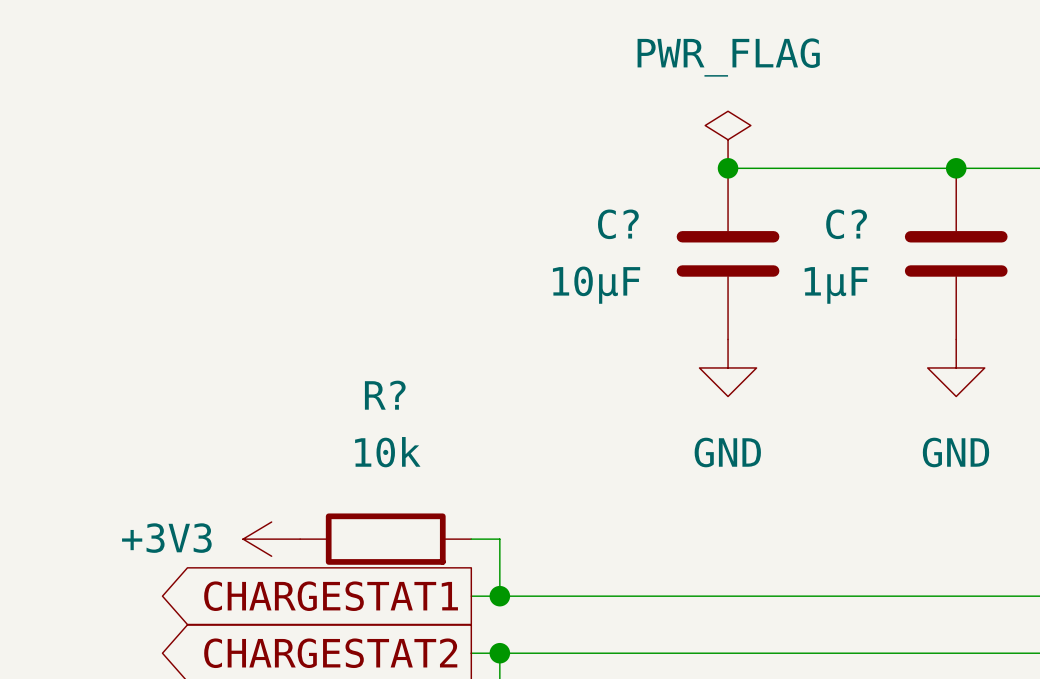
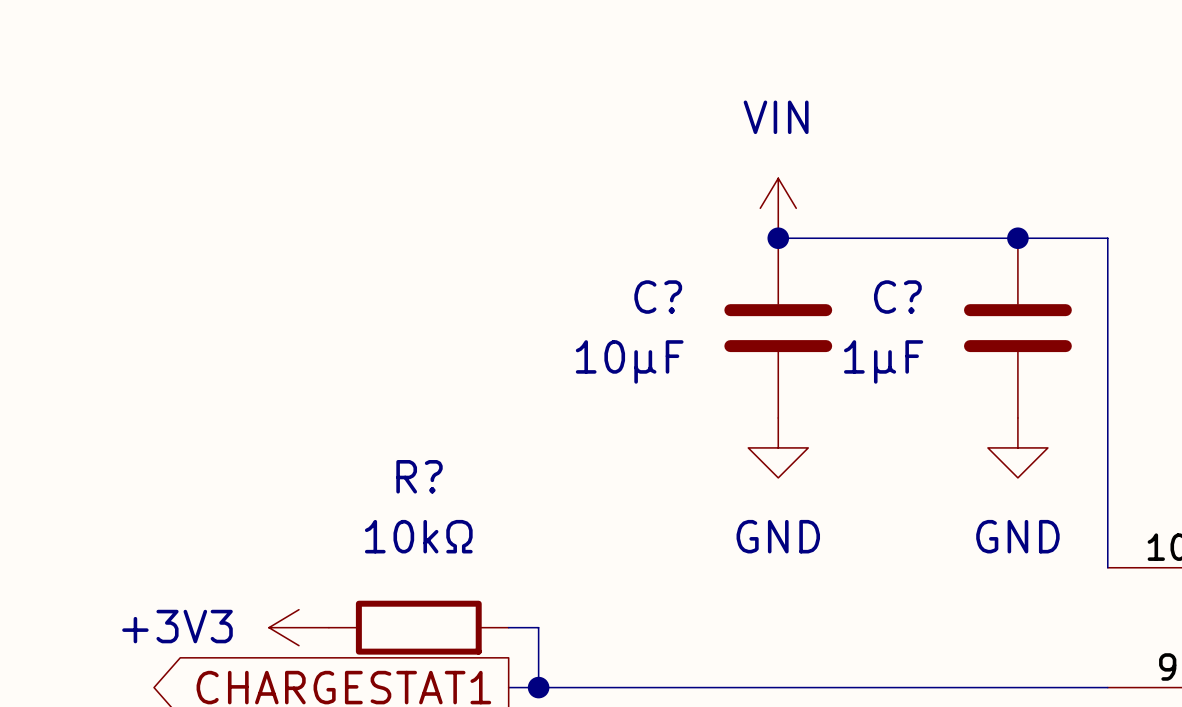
power symbol: PWR_FLAG (728, 139) -> VIN (778, 208)
R? value: 10k (387, 452) -> 10kΩ (418, 536)

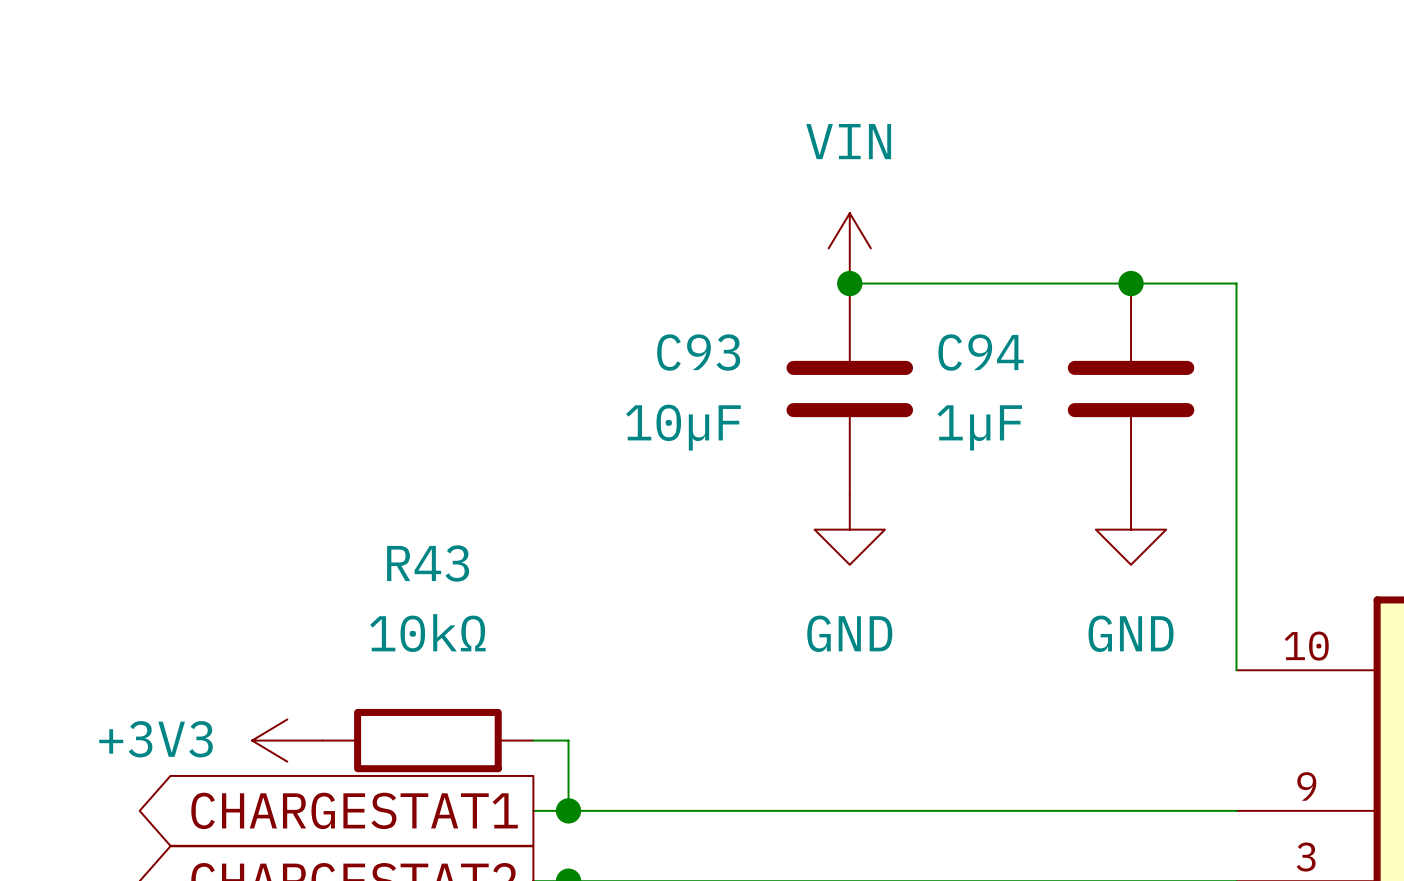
C? name: C? (658, 297) -> C93 (698, 352)
C? name: C? (897, 297) -> C94 (981, 352)
R? name: R? (419, 476) -> R43 (428, 563)

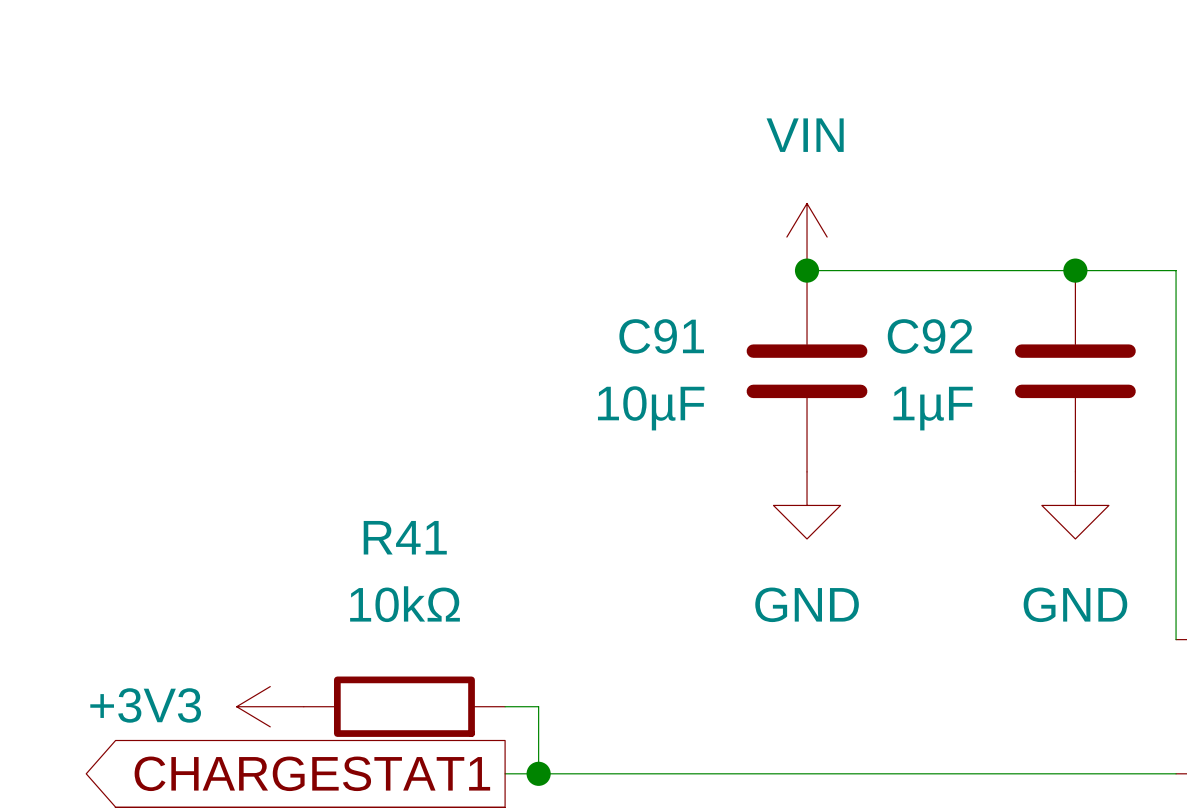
C93 name: C93 (698, 352) -> C91 (661, 336)
C94 name: C94 (981, 352) -> C92 (930, 336)
R43 name: R43 (428, 563) -> R41 (405, 537)

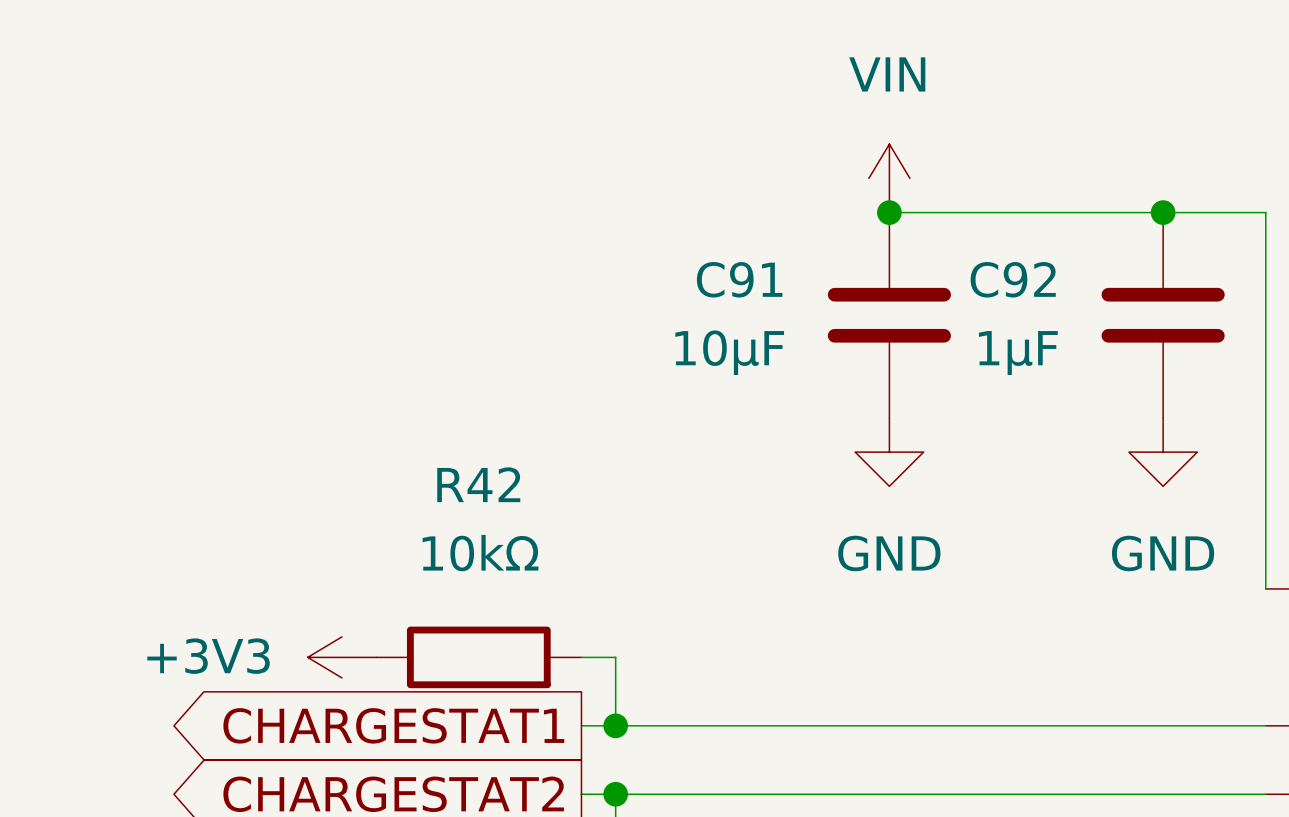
R41 name: R41 (405, 537) -> R42 (478, 484)

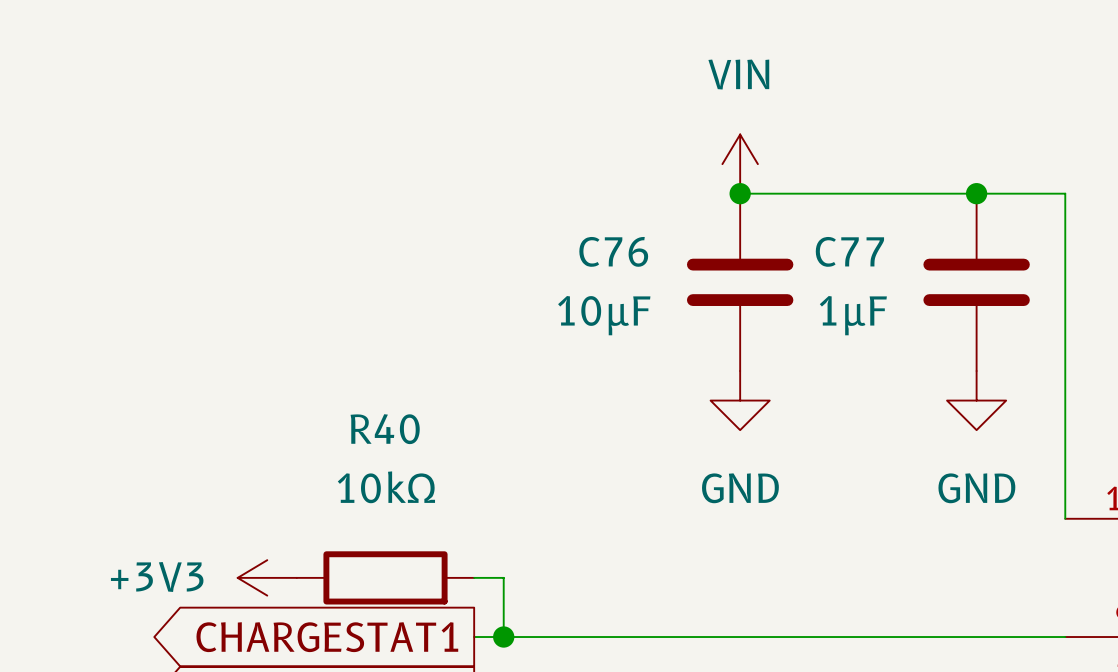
C91 name: C91 (739, 279) -> C76 (613, 251)
C92 name: C92 (1013, 279) -> C77 (849, 251)
R42 name: R42 (478, 484) -> R40 (385, 429)

